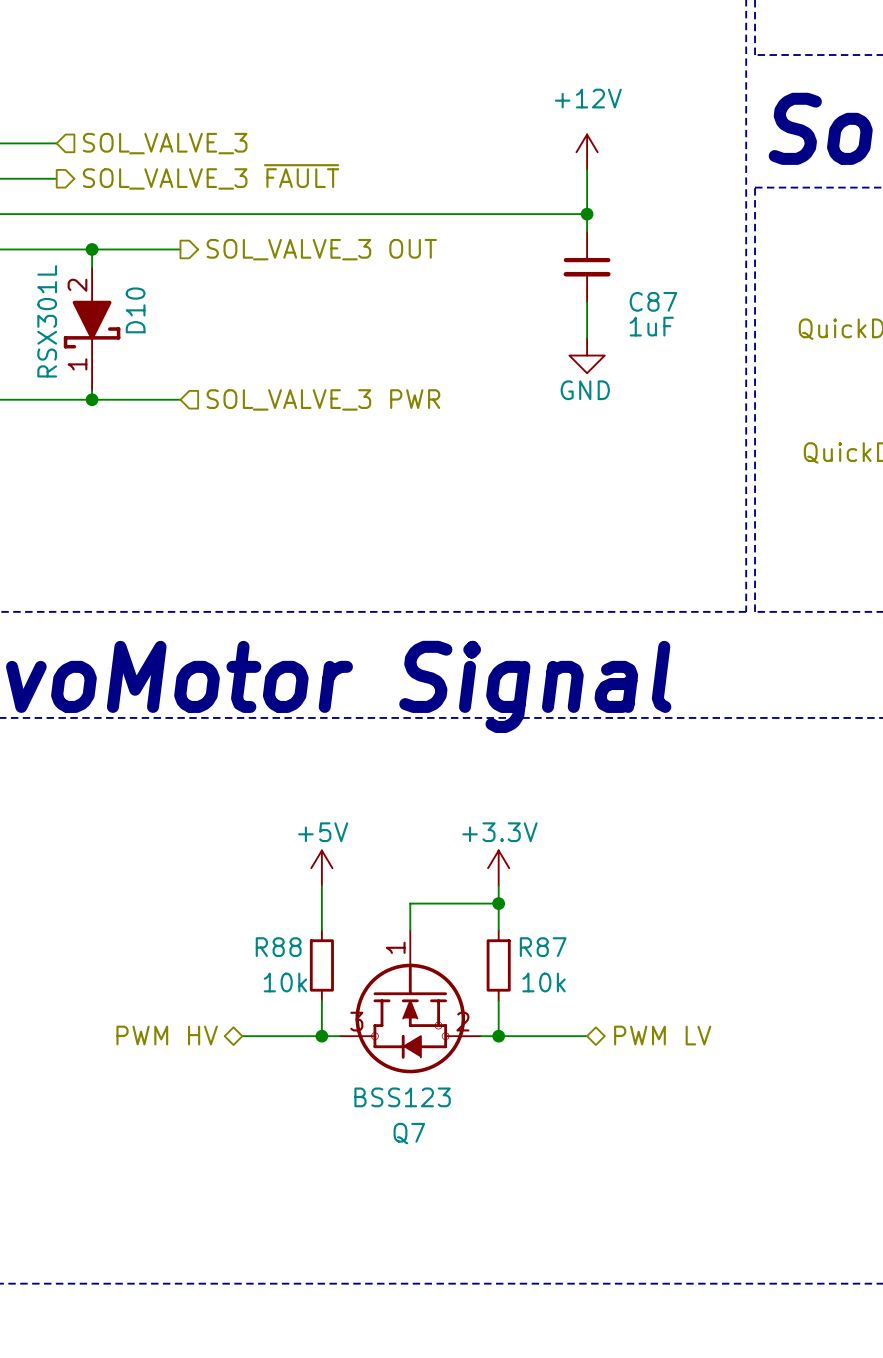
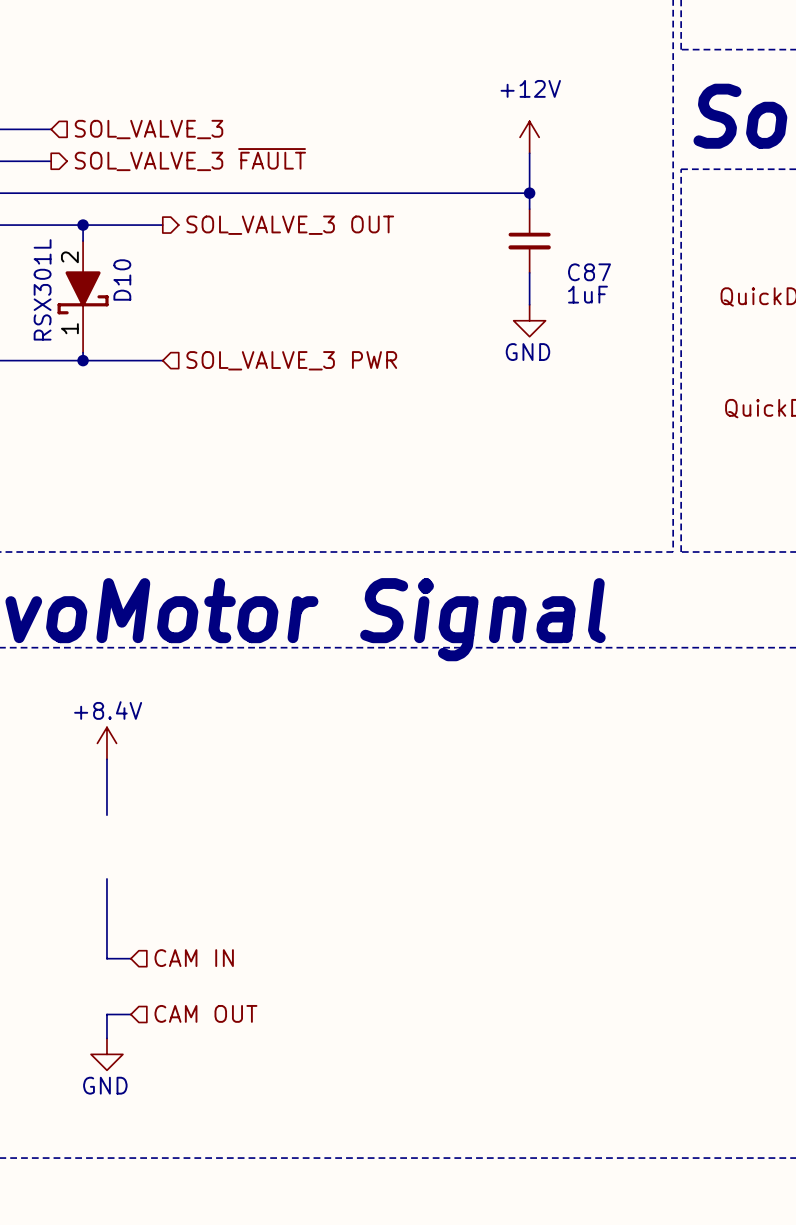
power symbol: none -> +8.4V (106, 743)
wire: none -> (106, 759) (106, 815)
power symbol: +5V (321, 868) -> none
power symbol: +3.3V (498, 868) -> none
wire: (321, 885) (321, 930) -> none
wire: (498, 885) (498, 930) -> none
wire: (498, 903) (410, 903) (410, 930) -> none
junction: (498, 903) -> none
R88: 10k (321, 965) -> none
R87: 10k (498, 965) -> none
wire: none -> (106, 878) (106, 958) (130, 958)
wire: (321, 1000) (321, 1036) -> none
wire: (498, 1000) (498, 1036) -> none
Q7: BSS123 (410, 1001) -> none
hierarchical label: PWM HV (167, 1035) -> none
hierarchical label: PWM LV (662, 1035) -> none
wire: (242, 1036) (339, 1036) -> none
junction: (321, 1036) -> none
wire: (481, 1036) (587, 1036) -> none
junction: (498, 1036) -> none
hierarchical label: none -> CAM IN (194, 958)
hierarchical label: none -> CAM OUT (205, 1013)
wire: none -> (130, 1014) (106, 1014) (106, 1038)
power symbol: none -> GND (106, 1054)

